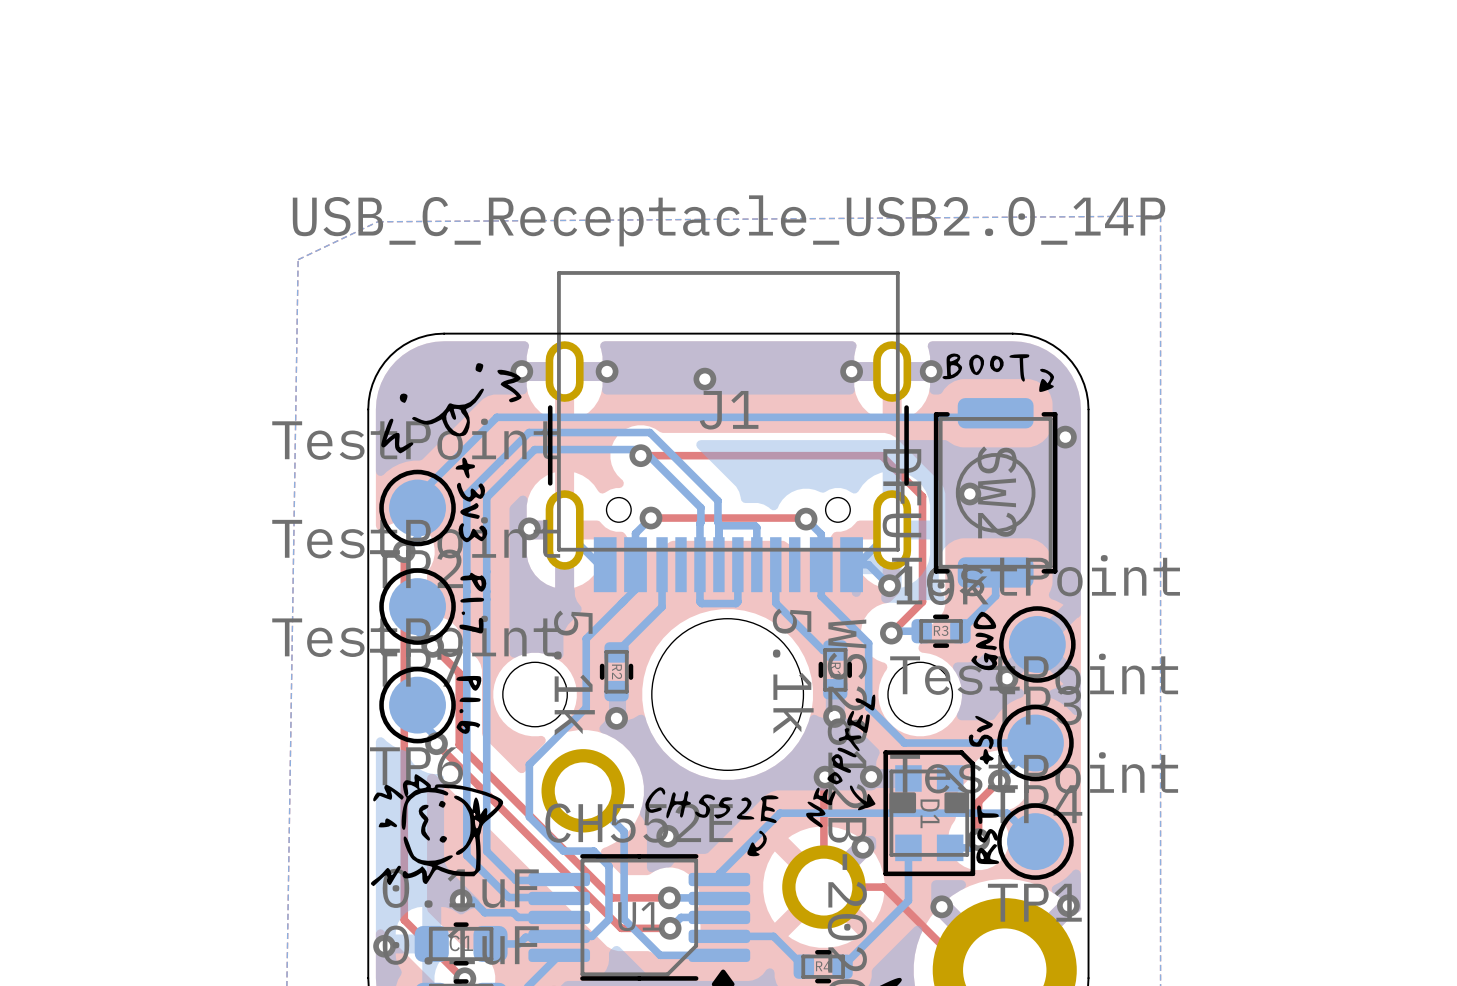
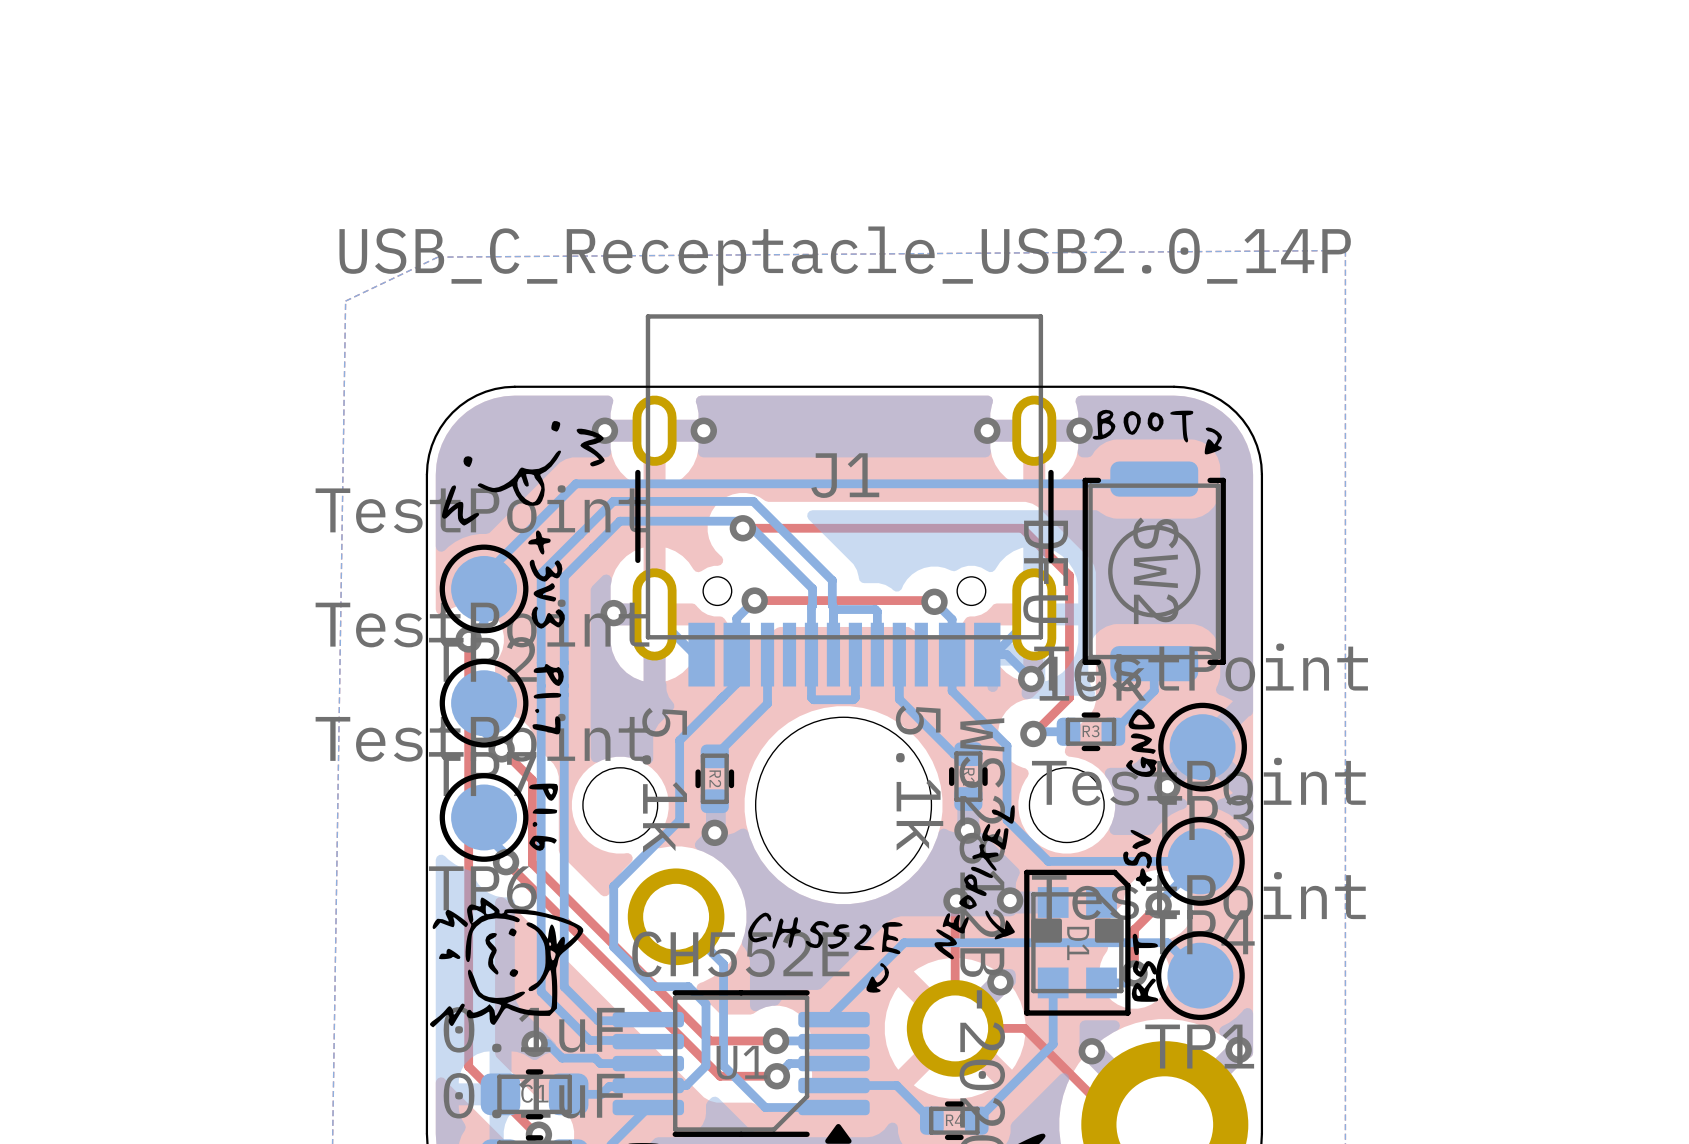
via: (704, 379) -> none
via: (1065, 437) -> none
via: (969, 493) -> none
via: (667, 836) -> none
via: (384, 946) -> none

